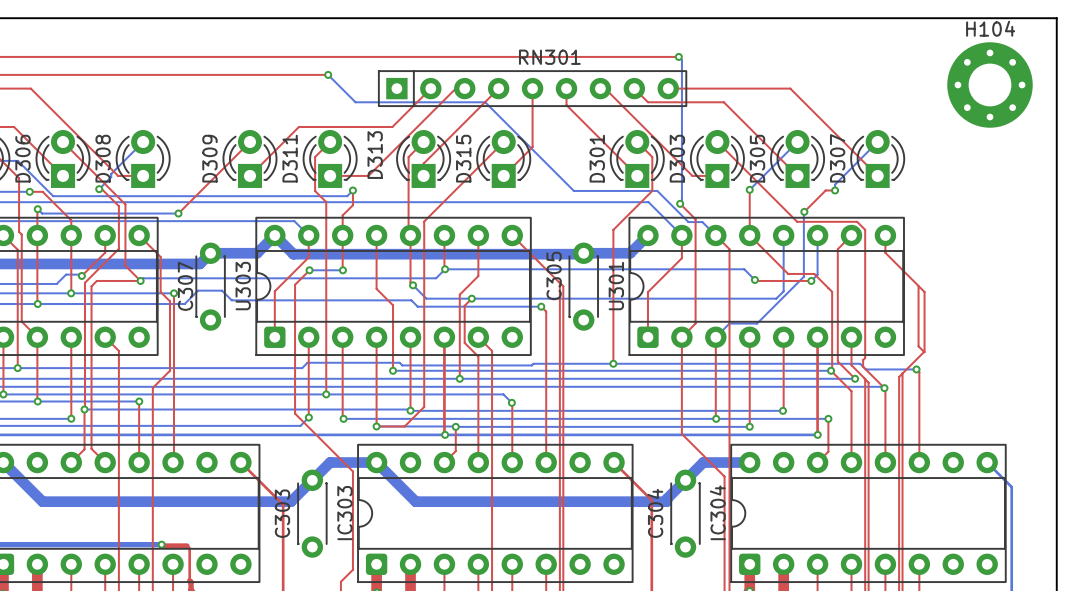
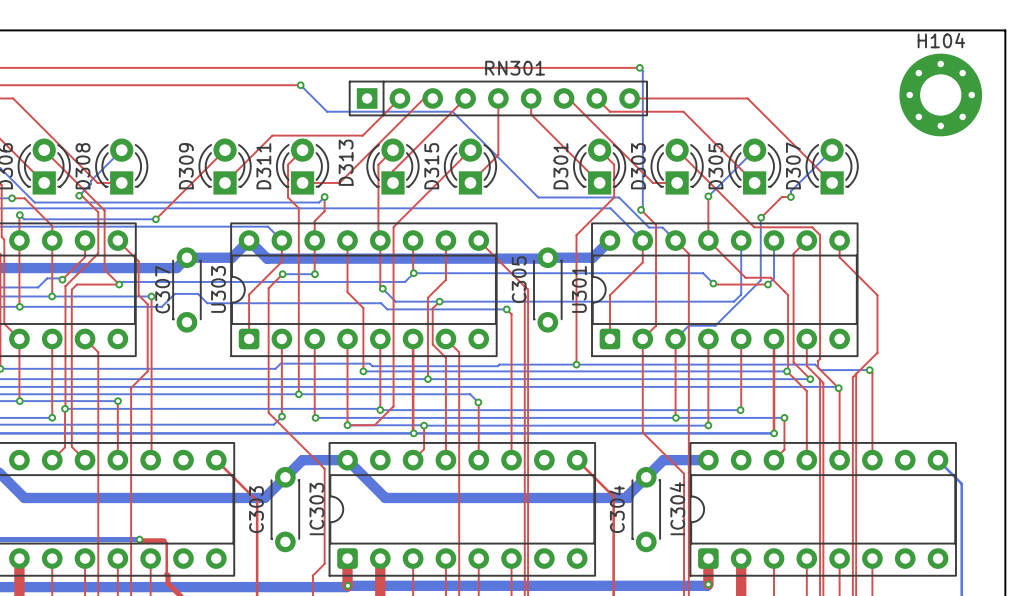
top track: (918, 286) (918, 346) (923, 351) -> none

